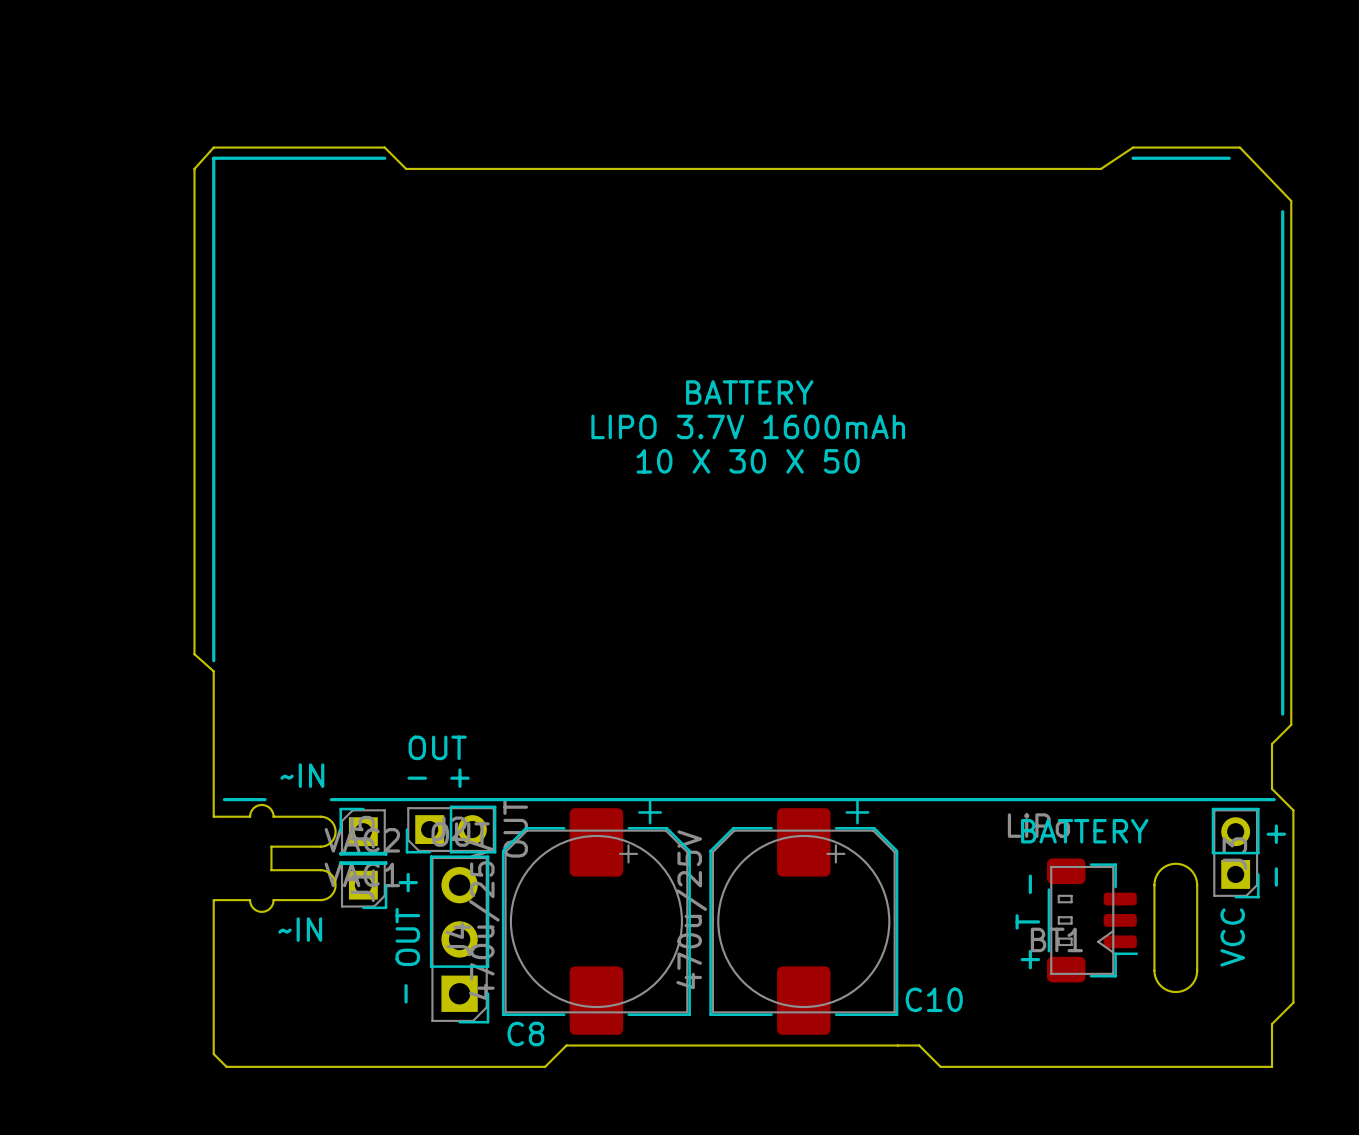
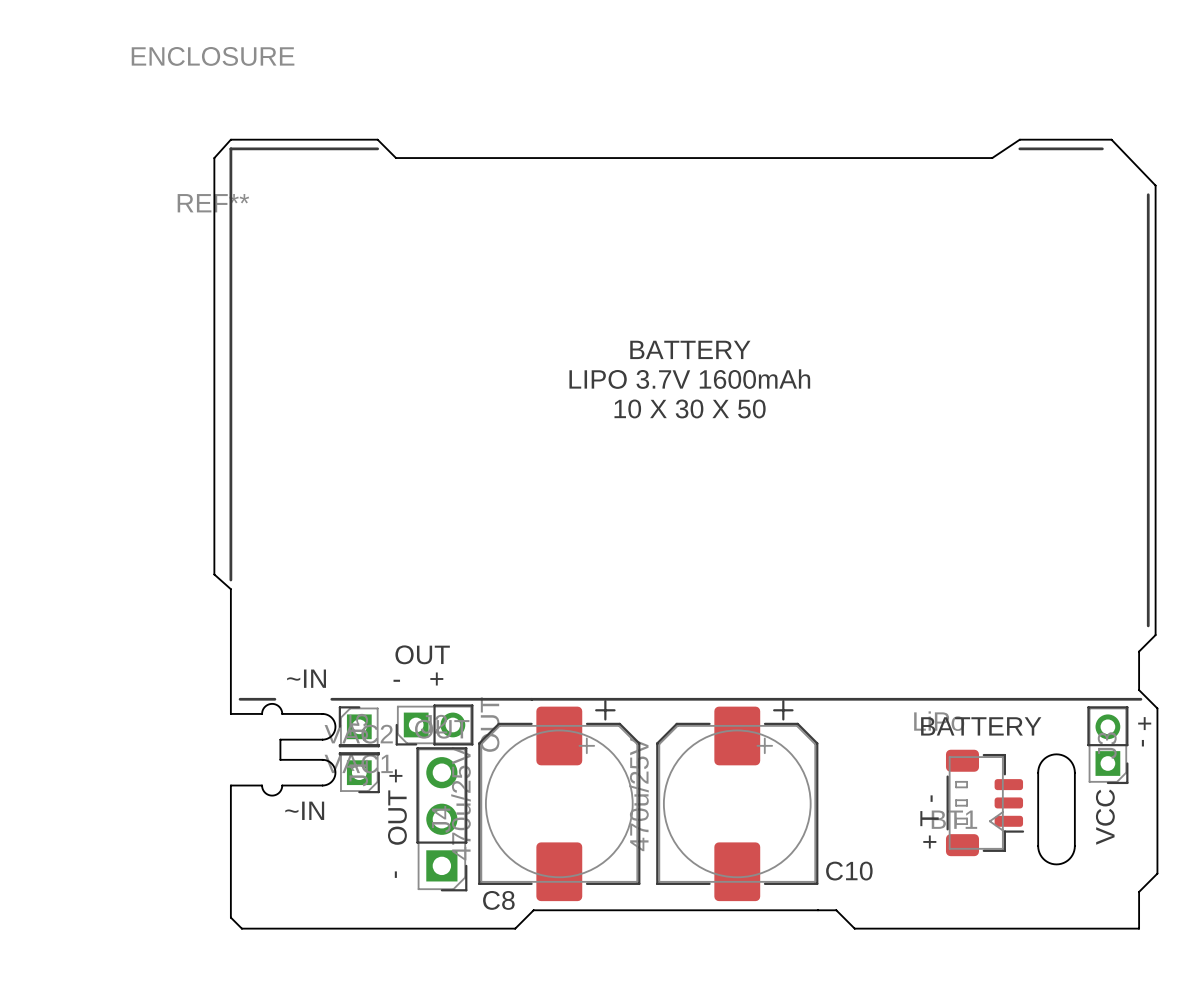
REF**: none -> ENCLOSURE (213, 129)

